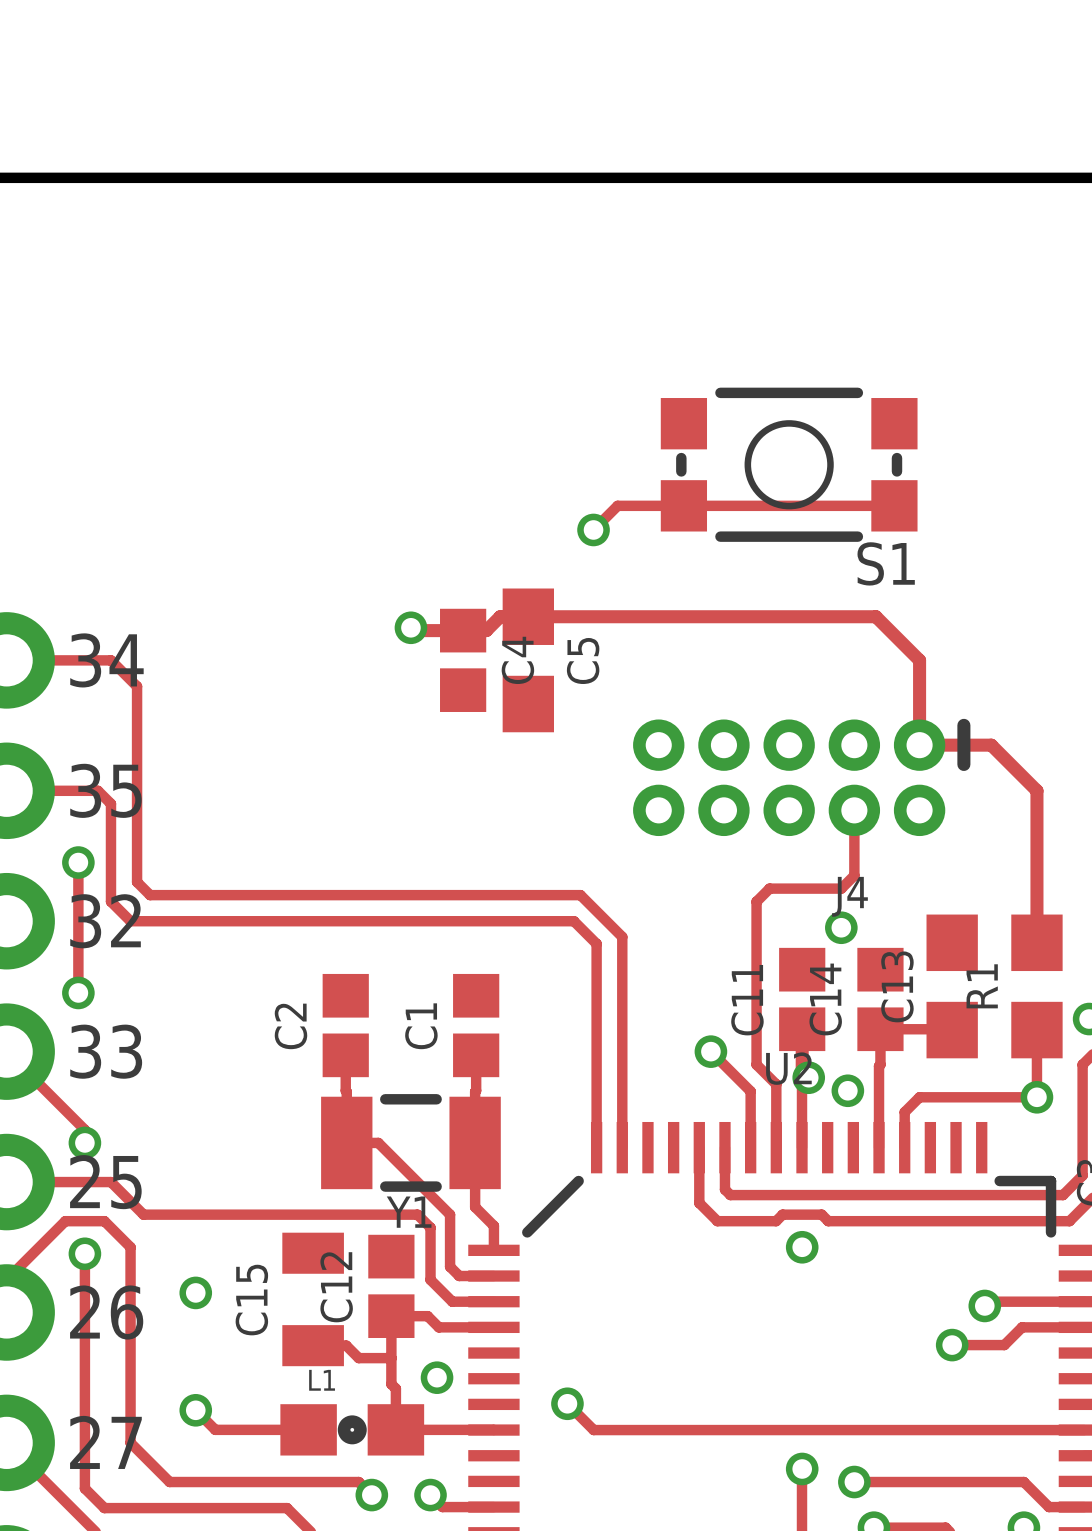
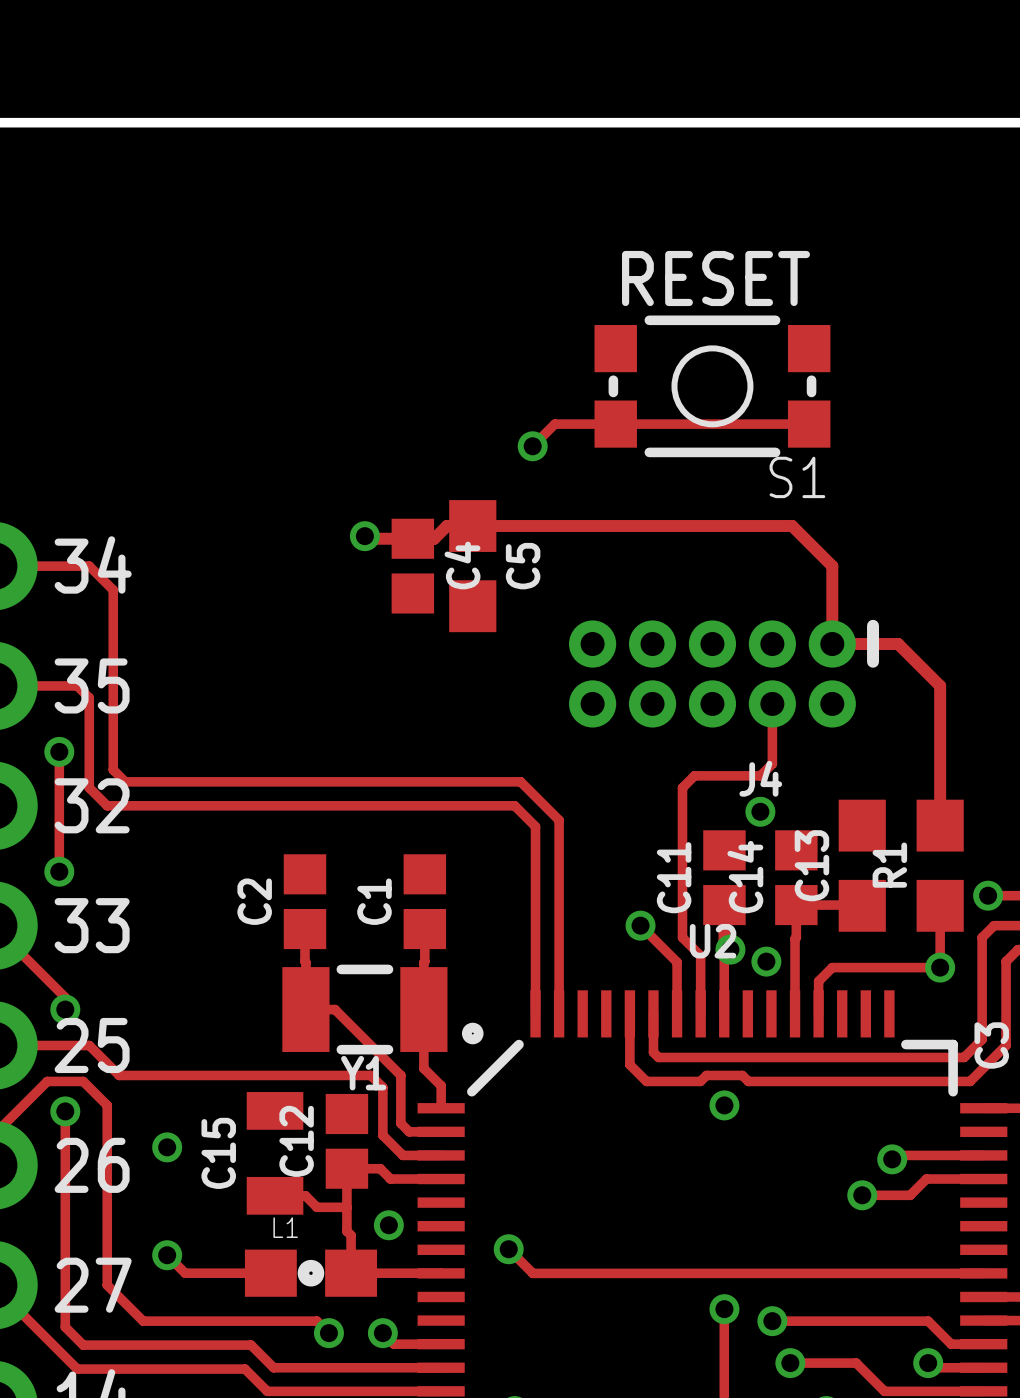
text: none -> RESET (715, 278)
drawing: none -> [461, 1022, 484, 1045]

